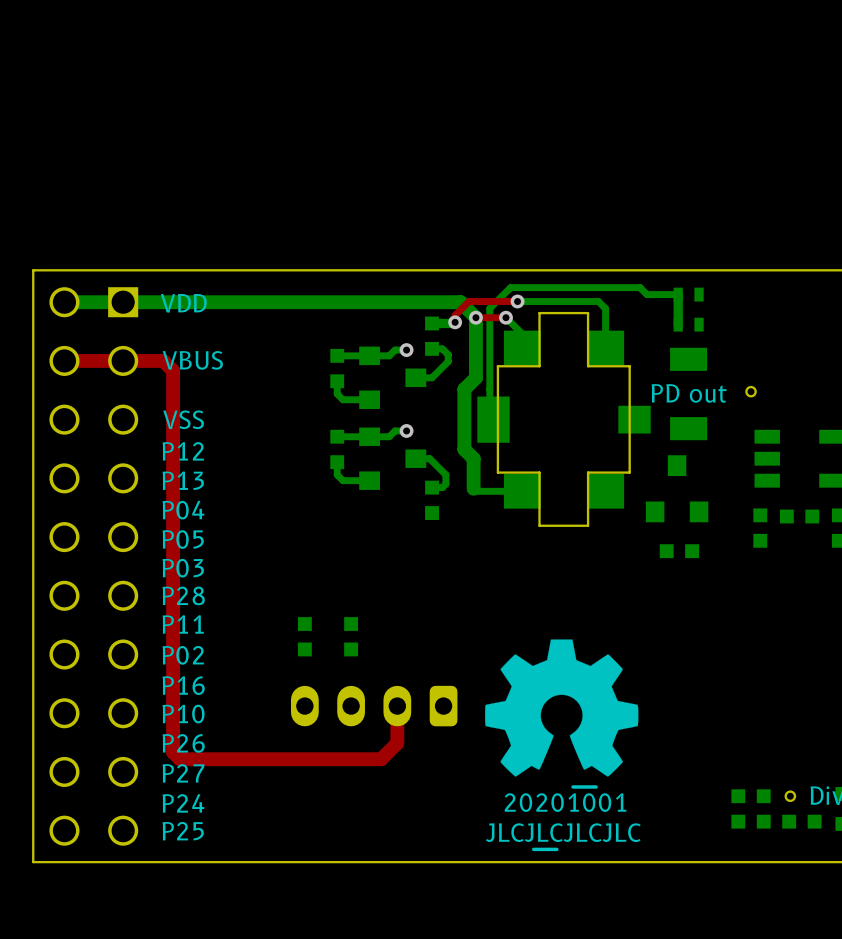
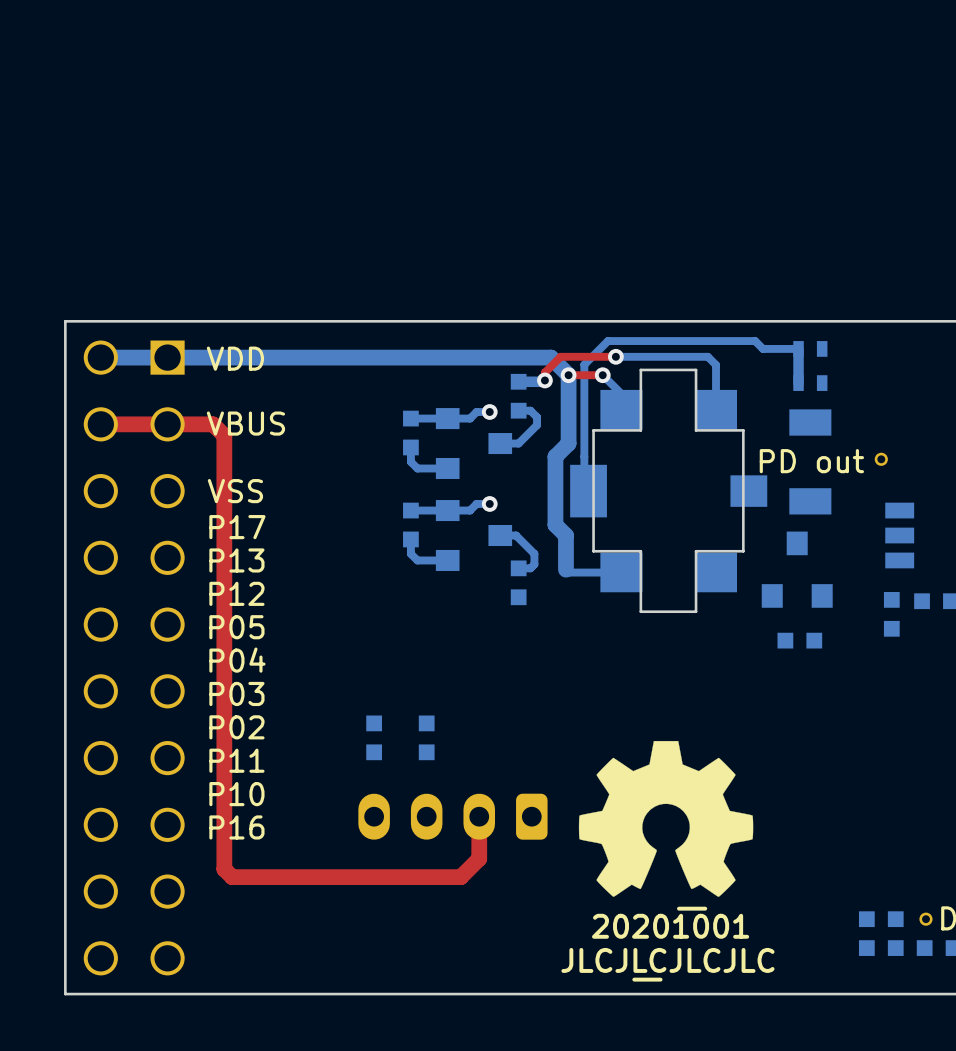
text: P12 (183, 451) -> P17 (237, 527)
text: P04 (183, 510) -> P12 (236, 593)
text: P03 (183, 568) -> P04 (237, 660)
text: P28 (183, 595) -> P03 (236, 693)
text: P11 (183, 624) -> P02 (236, 727)
text: P02 (183, 655) -> P11 (236, 760)
text: P16 (183, 685) -> P10 (236, 794)
text: P10 (183, 714) -> P16 (236, 827)
text: P26 (183, 743) -> none
text: P27 (183, 773) -> none
text: P24 (183, 803) -> none
text: P25 (183, 831) -> none

